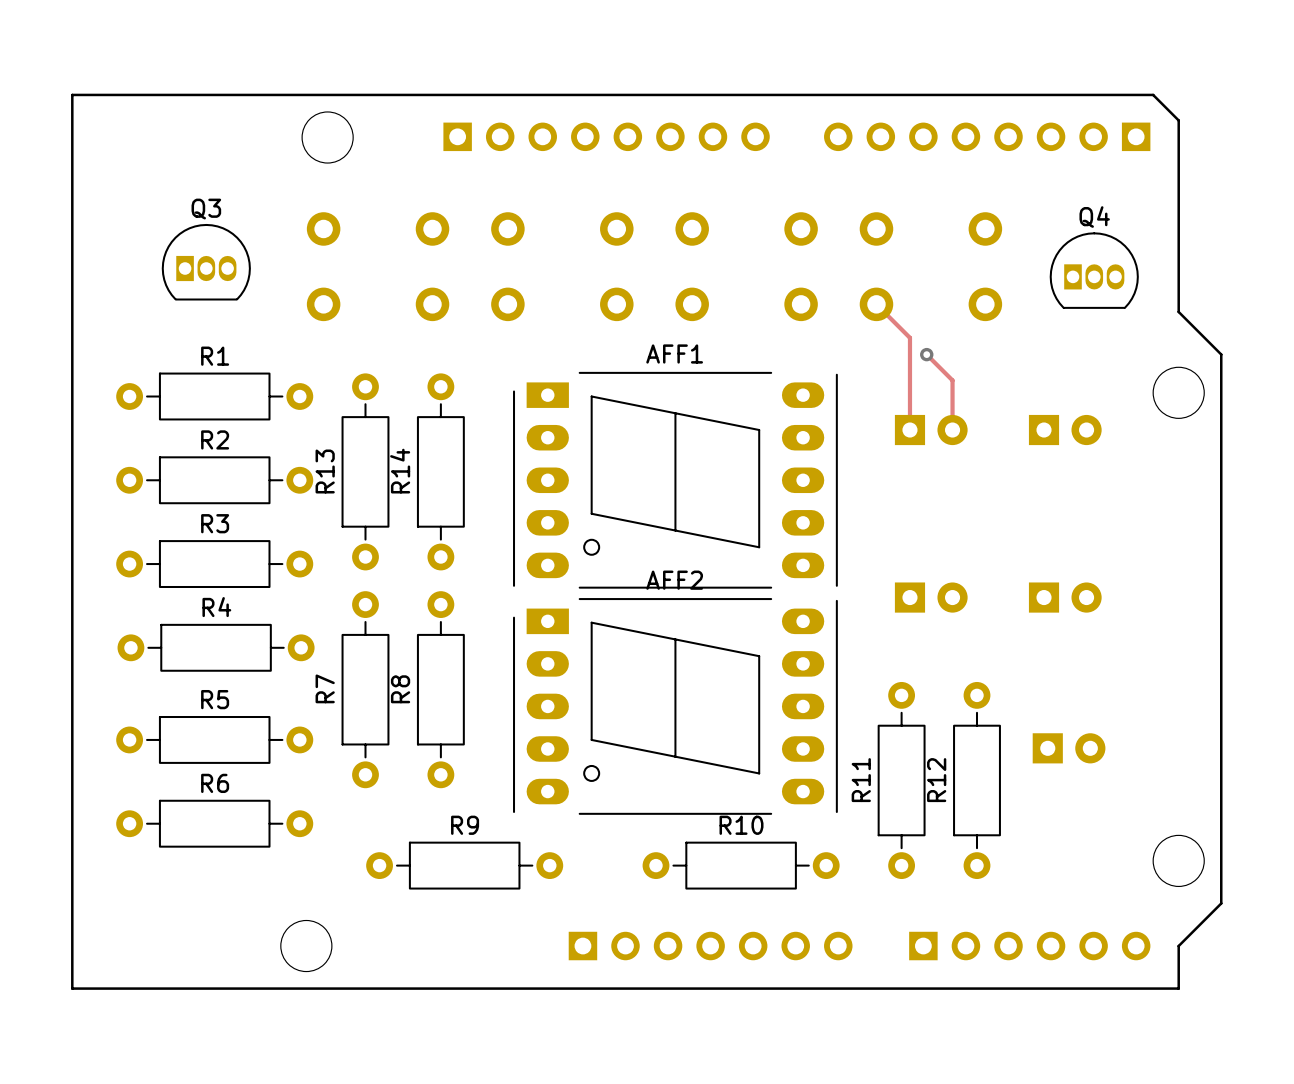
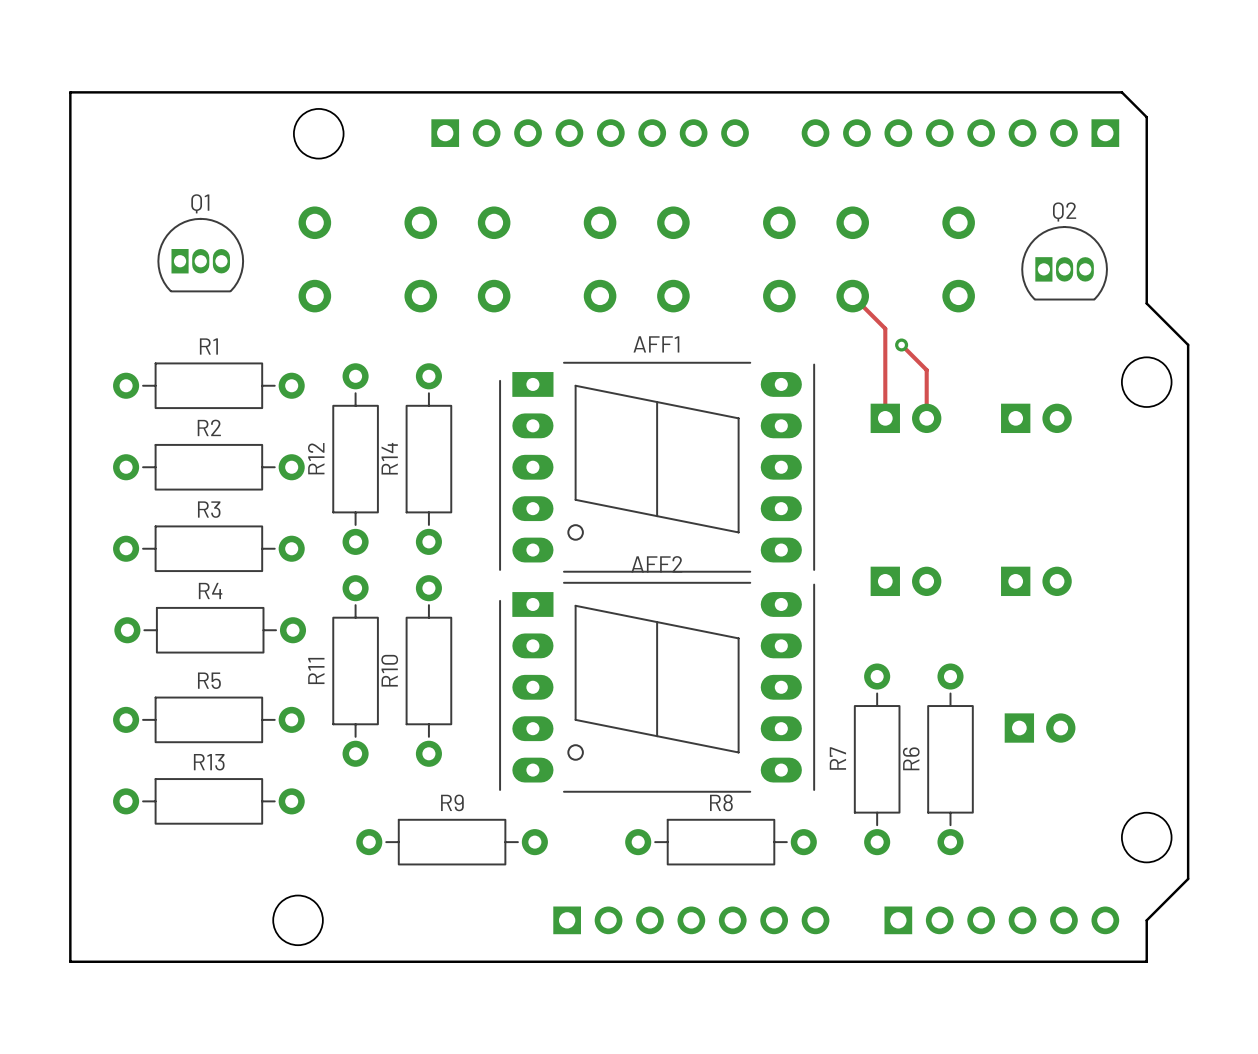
Q3 name: Q3 (206, 209) -> Q1 (200, 203)
Q4 name: Q4 (1094, 217) -> Q2 (1064, 211)
R13 name: R13 (325, 471) -> R12 (316, 458)
R7 name: R7 (325, 688) -> R11 (316, 670)
R8 name: R8 (400, 689) -> R10 (389, 670)
R11 name: R11 (861, 780) -> R7 (837, 758)
R12 name: R12 (936, 780) -> R6 (911, 758)
R6 name: R6 (215, 783) -> R13 (209, 762)
R10 name: R10 (741, 825) -> R8 (721, 802)

